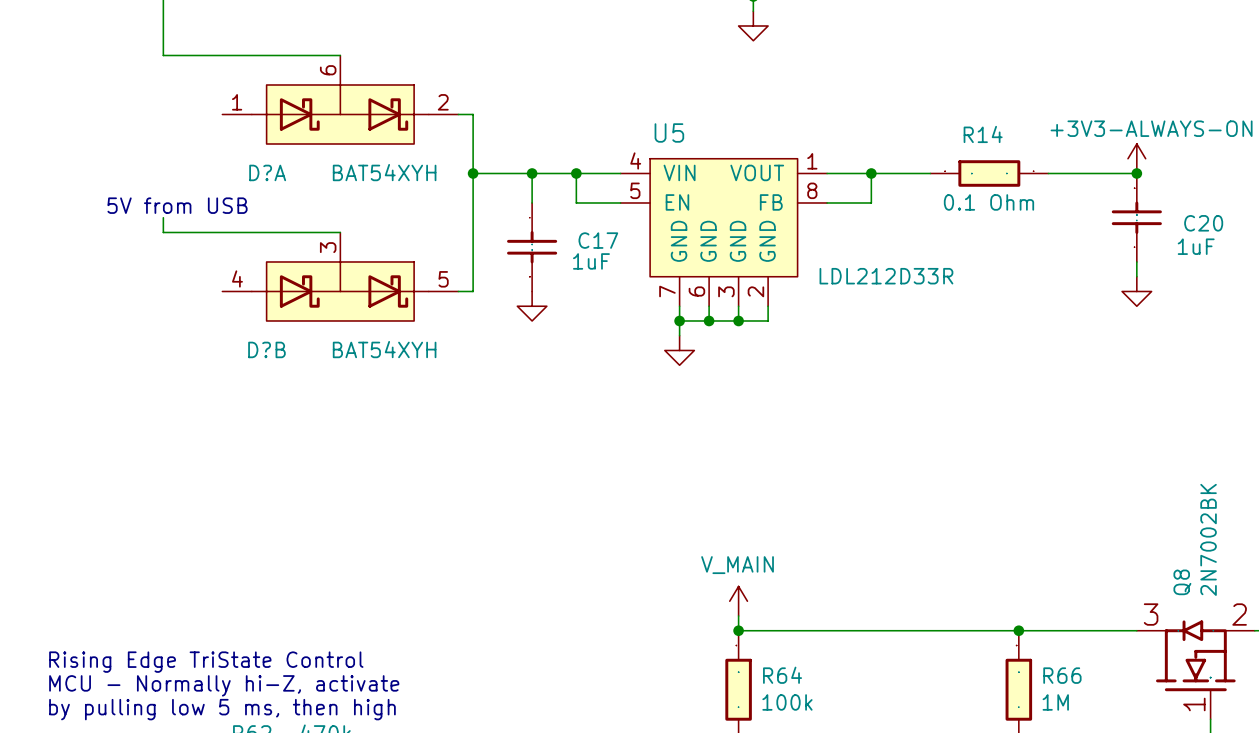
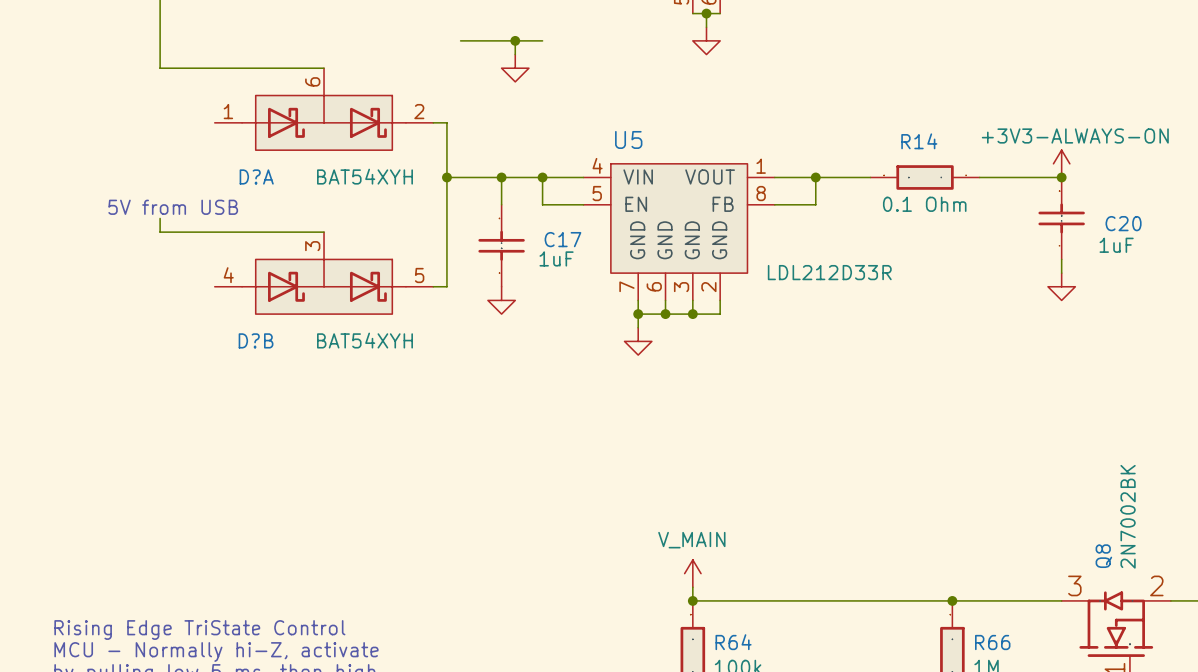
wire: none -> (460, 40) (542, 40)
wire: none -> (515, 40) (515, 54)
junction: none -> (515, 40)
power symbol: none -> (515, 68)

